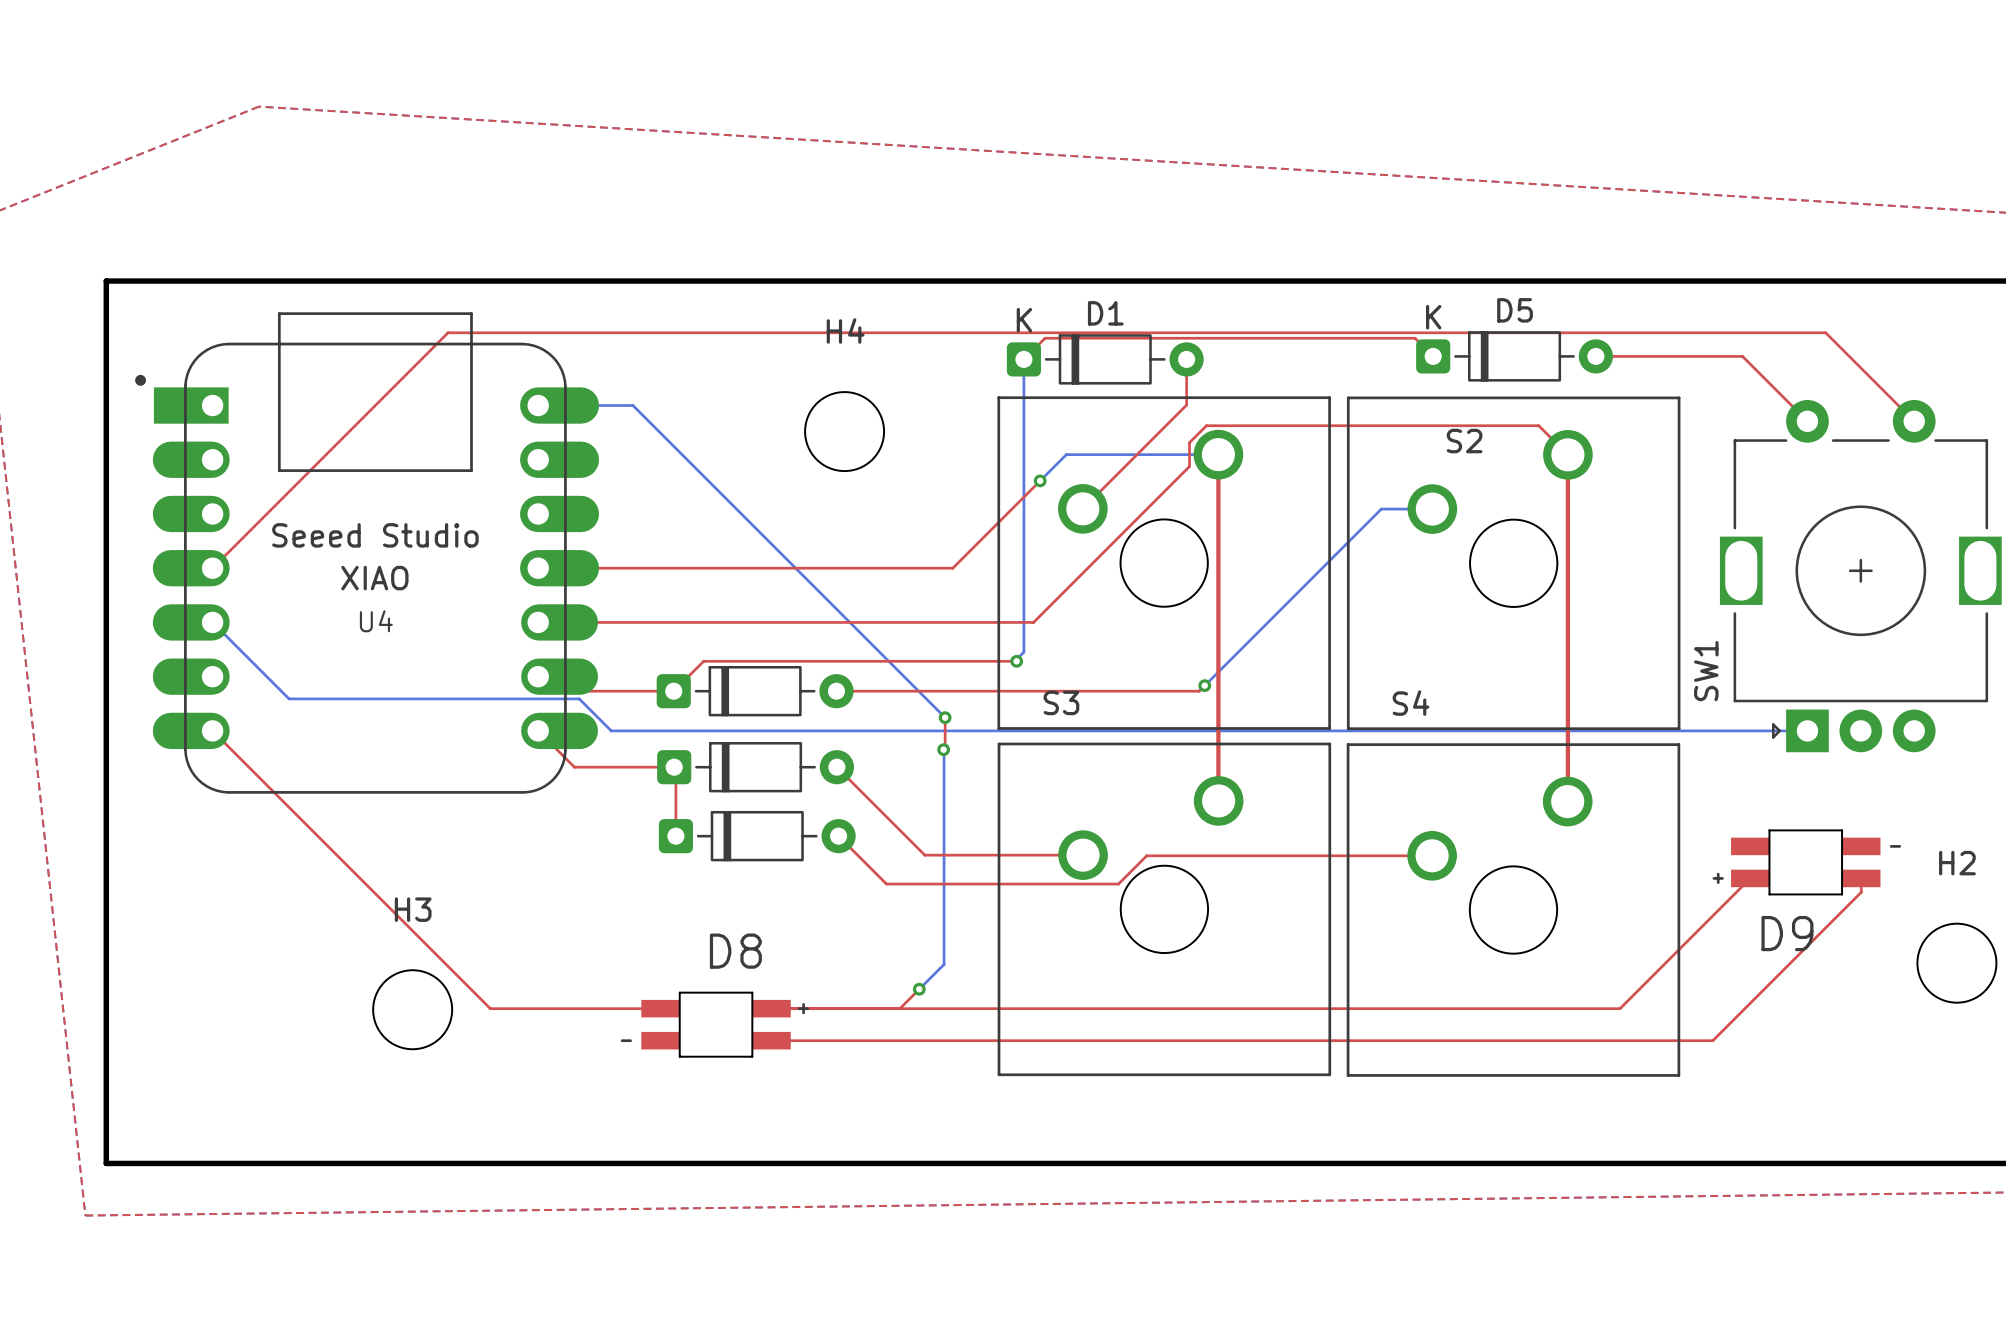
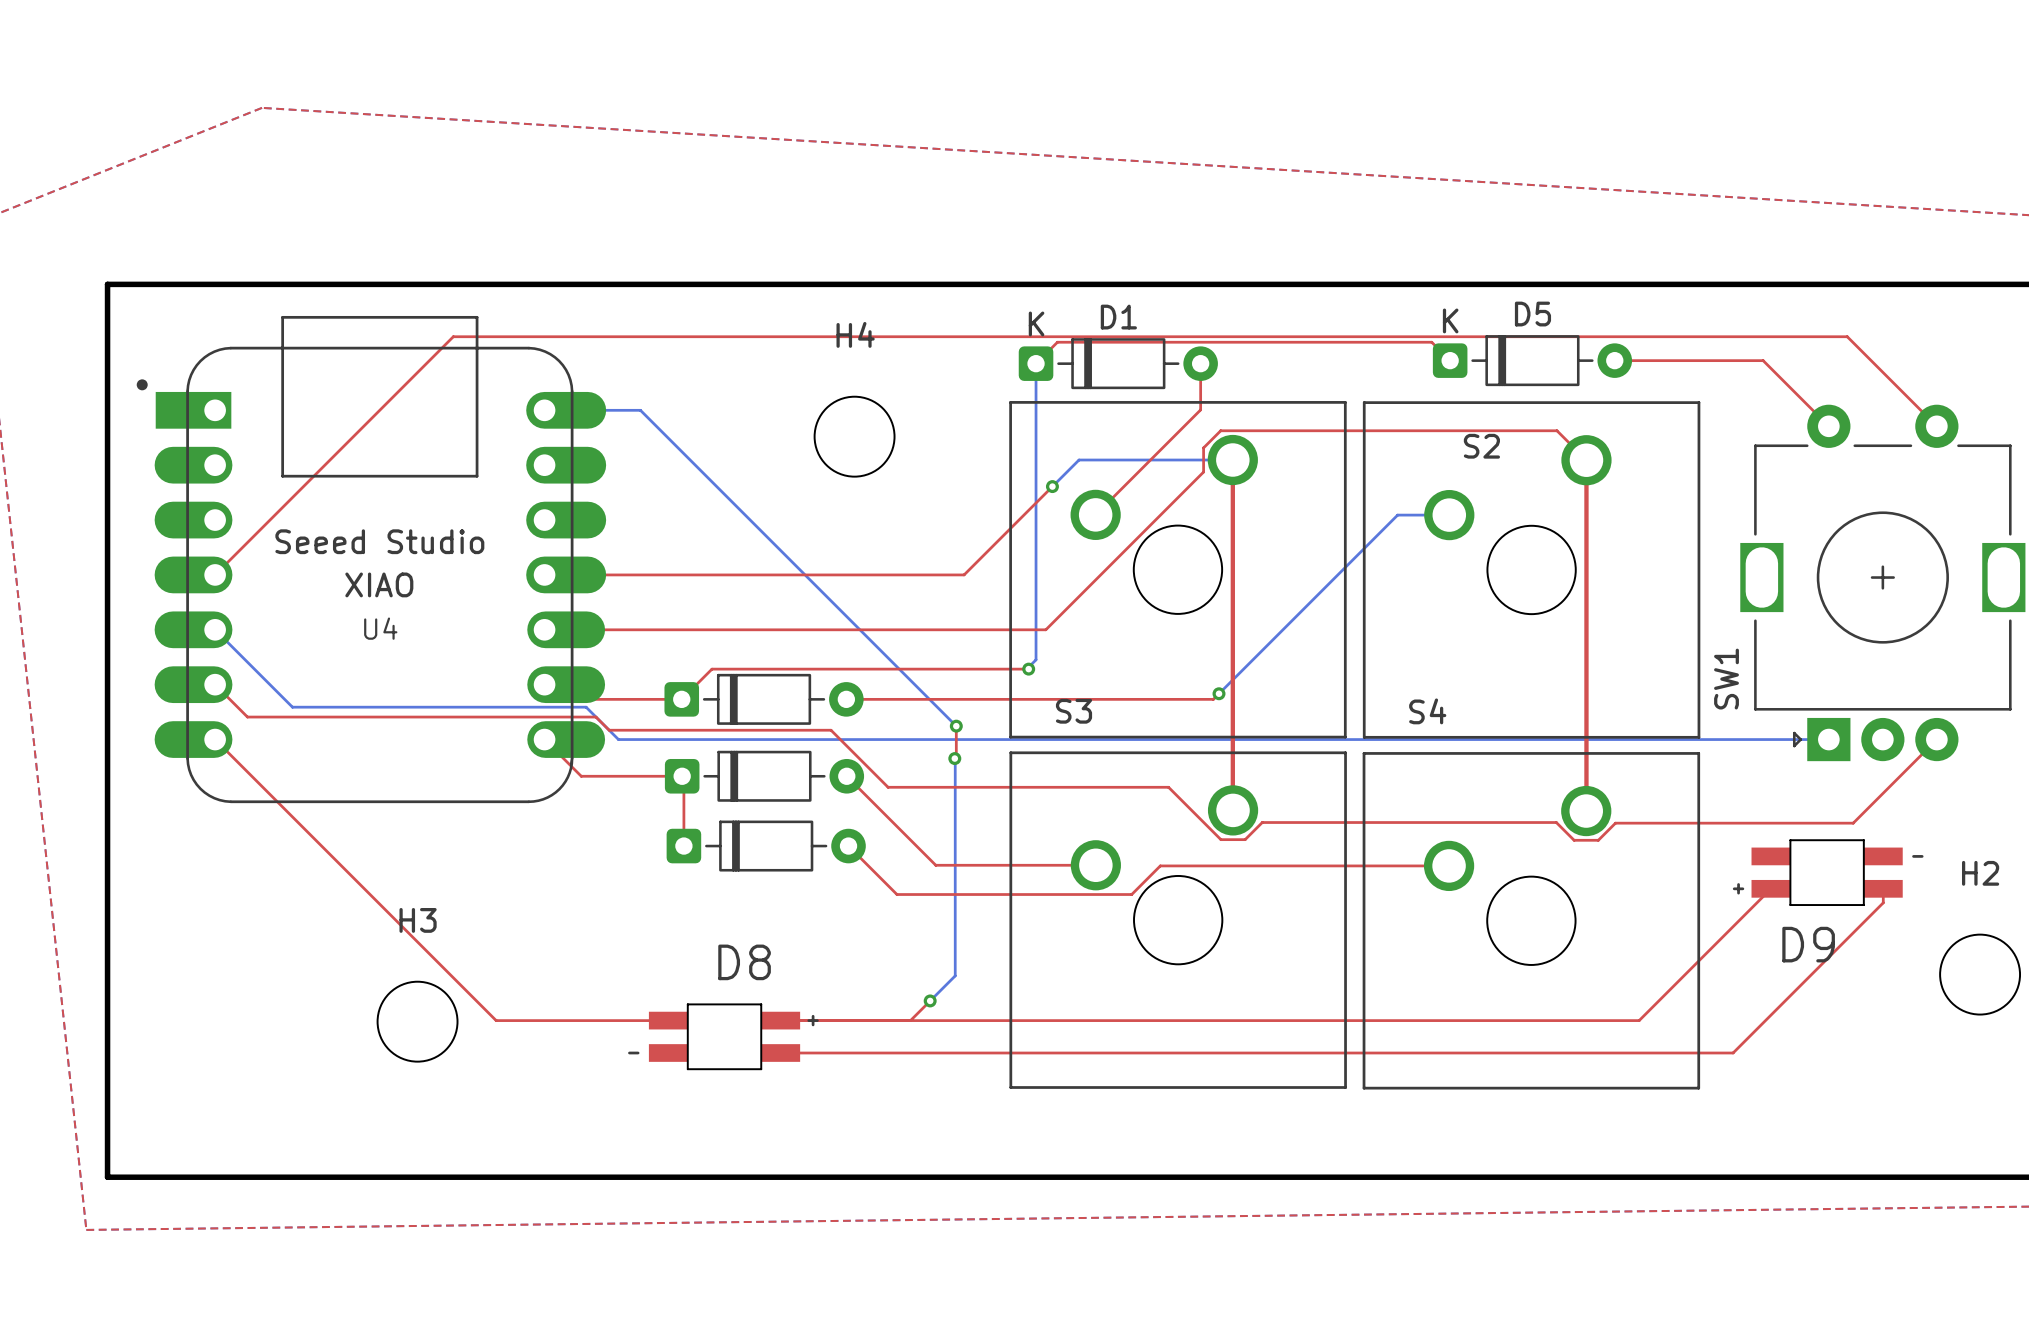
top track: none -> (215, 684) (247, 717) (596, 717) (609, 730) (831, 730) (888, 787) (1168, 787) (1220, 839) (1245, 839) (1262, 822) (1556, 822) (1574, 840) (1598, 840) (1615, 823) (1853, 823) (1936, 739)

